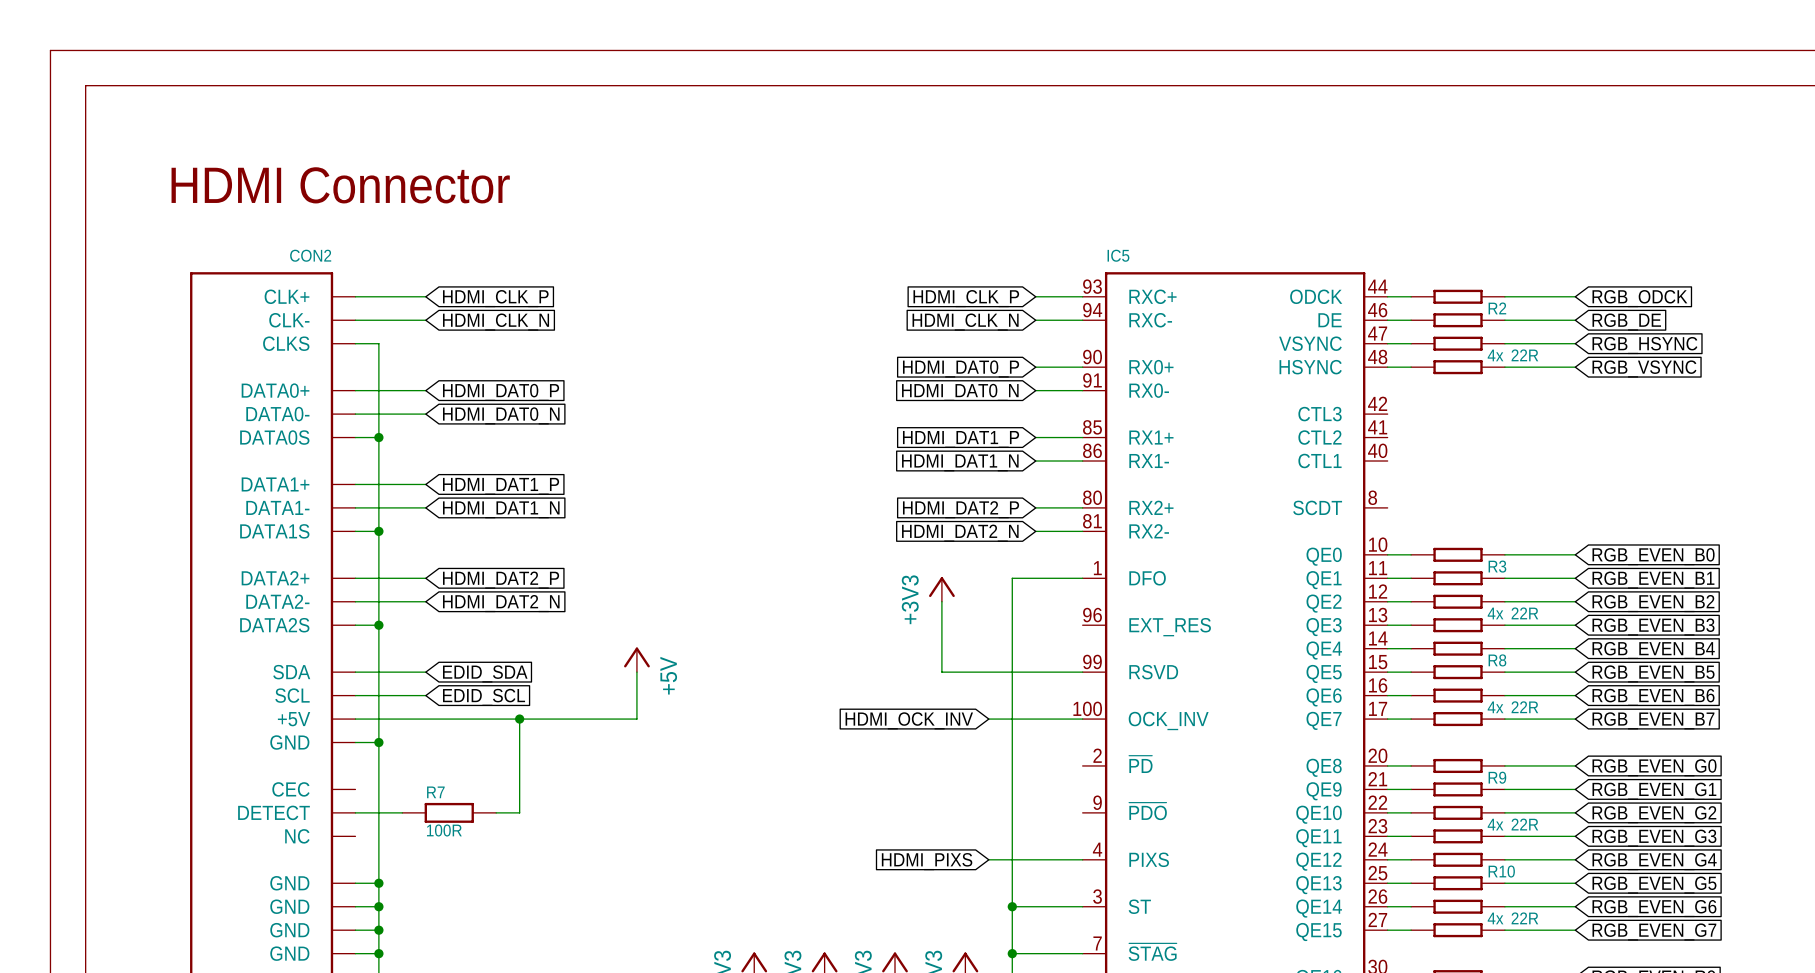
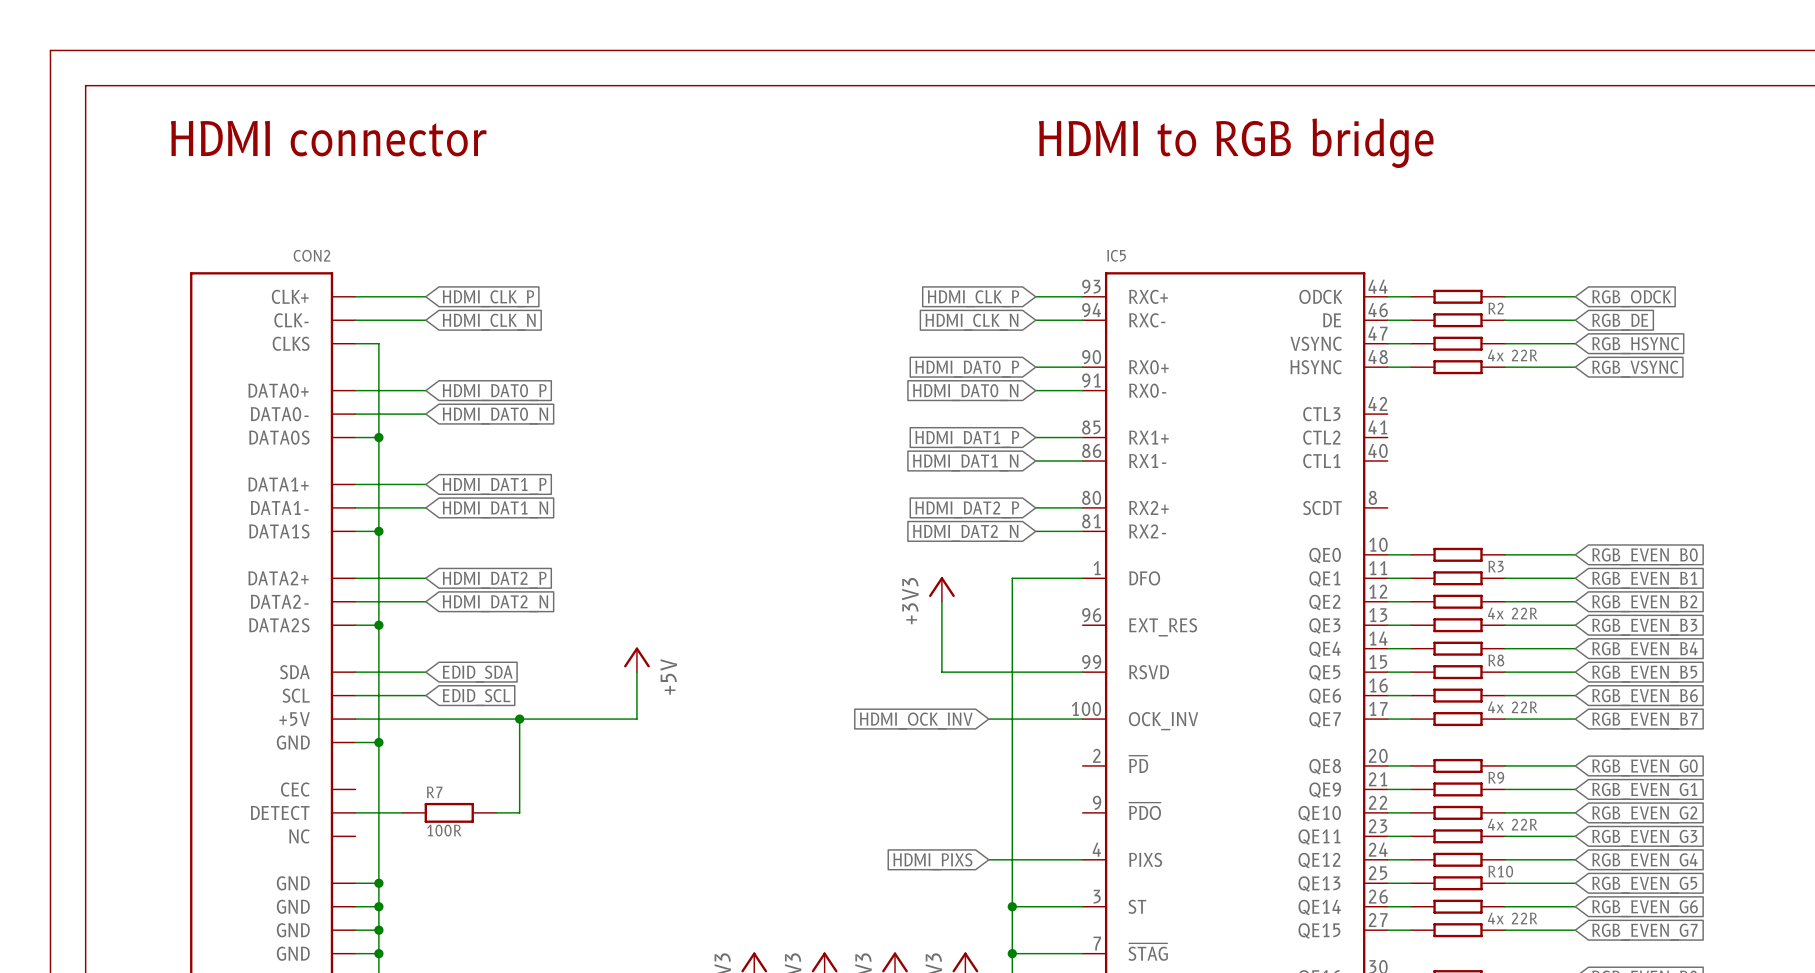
text: none -> HDMI to RGB bridge (1236, 143)
text: HDMI Connector (340, 185) -> HDMI connector (328, 138)

